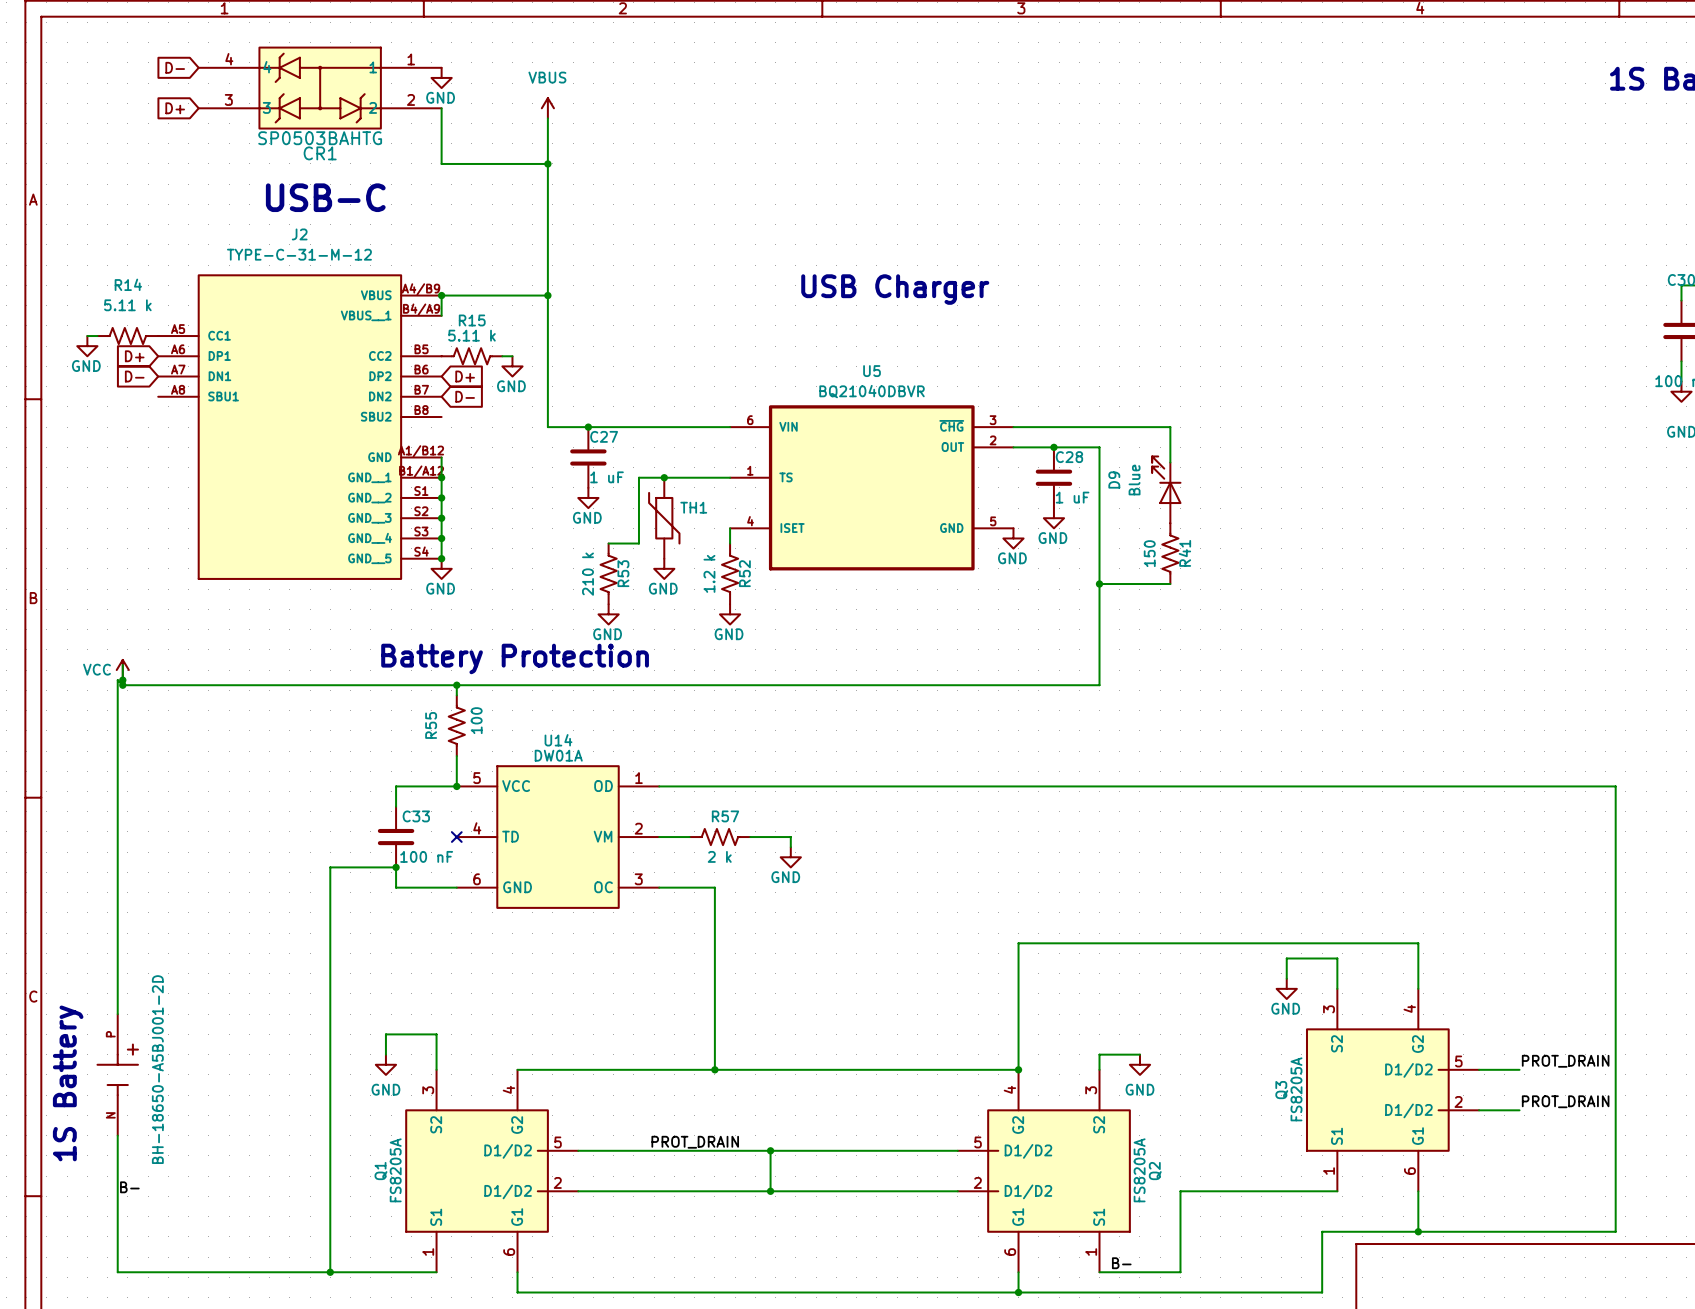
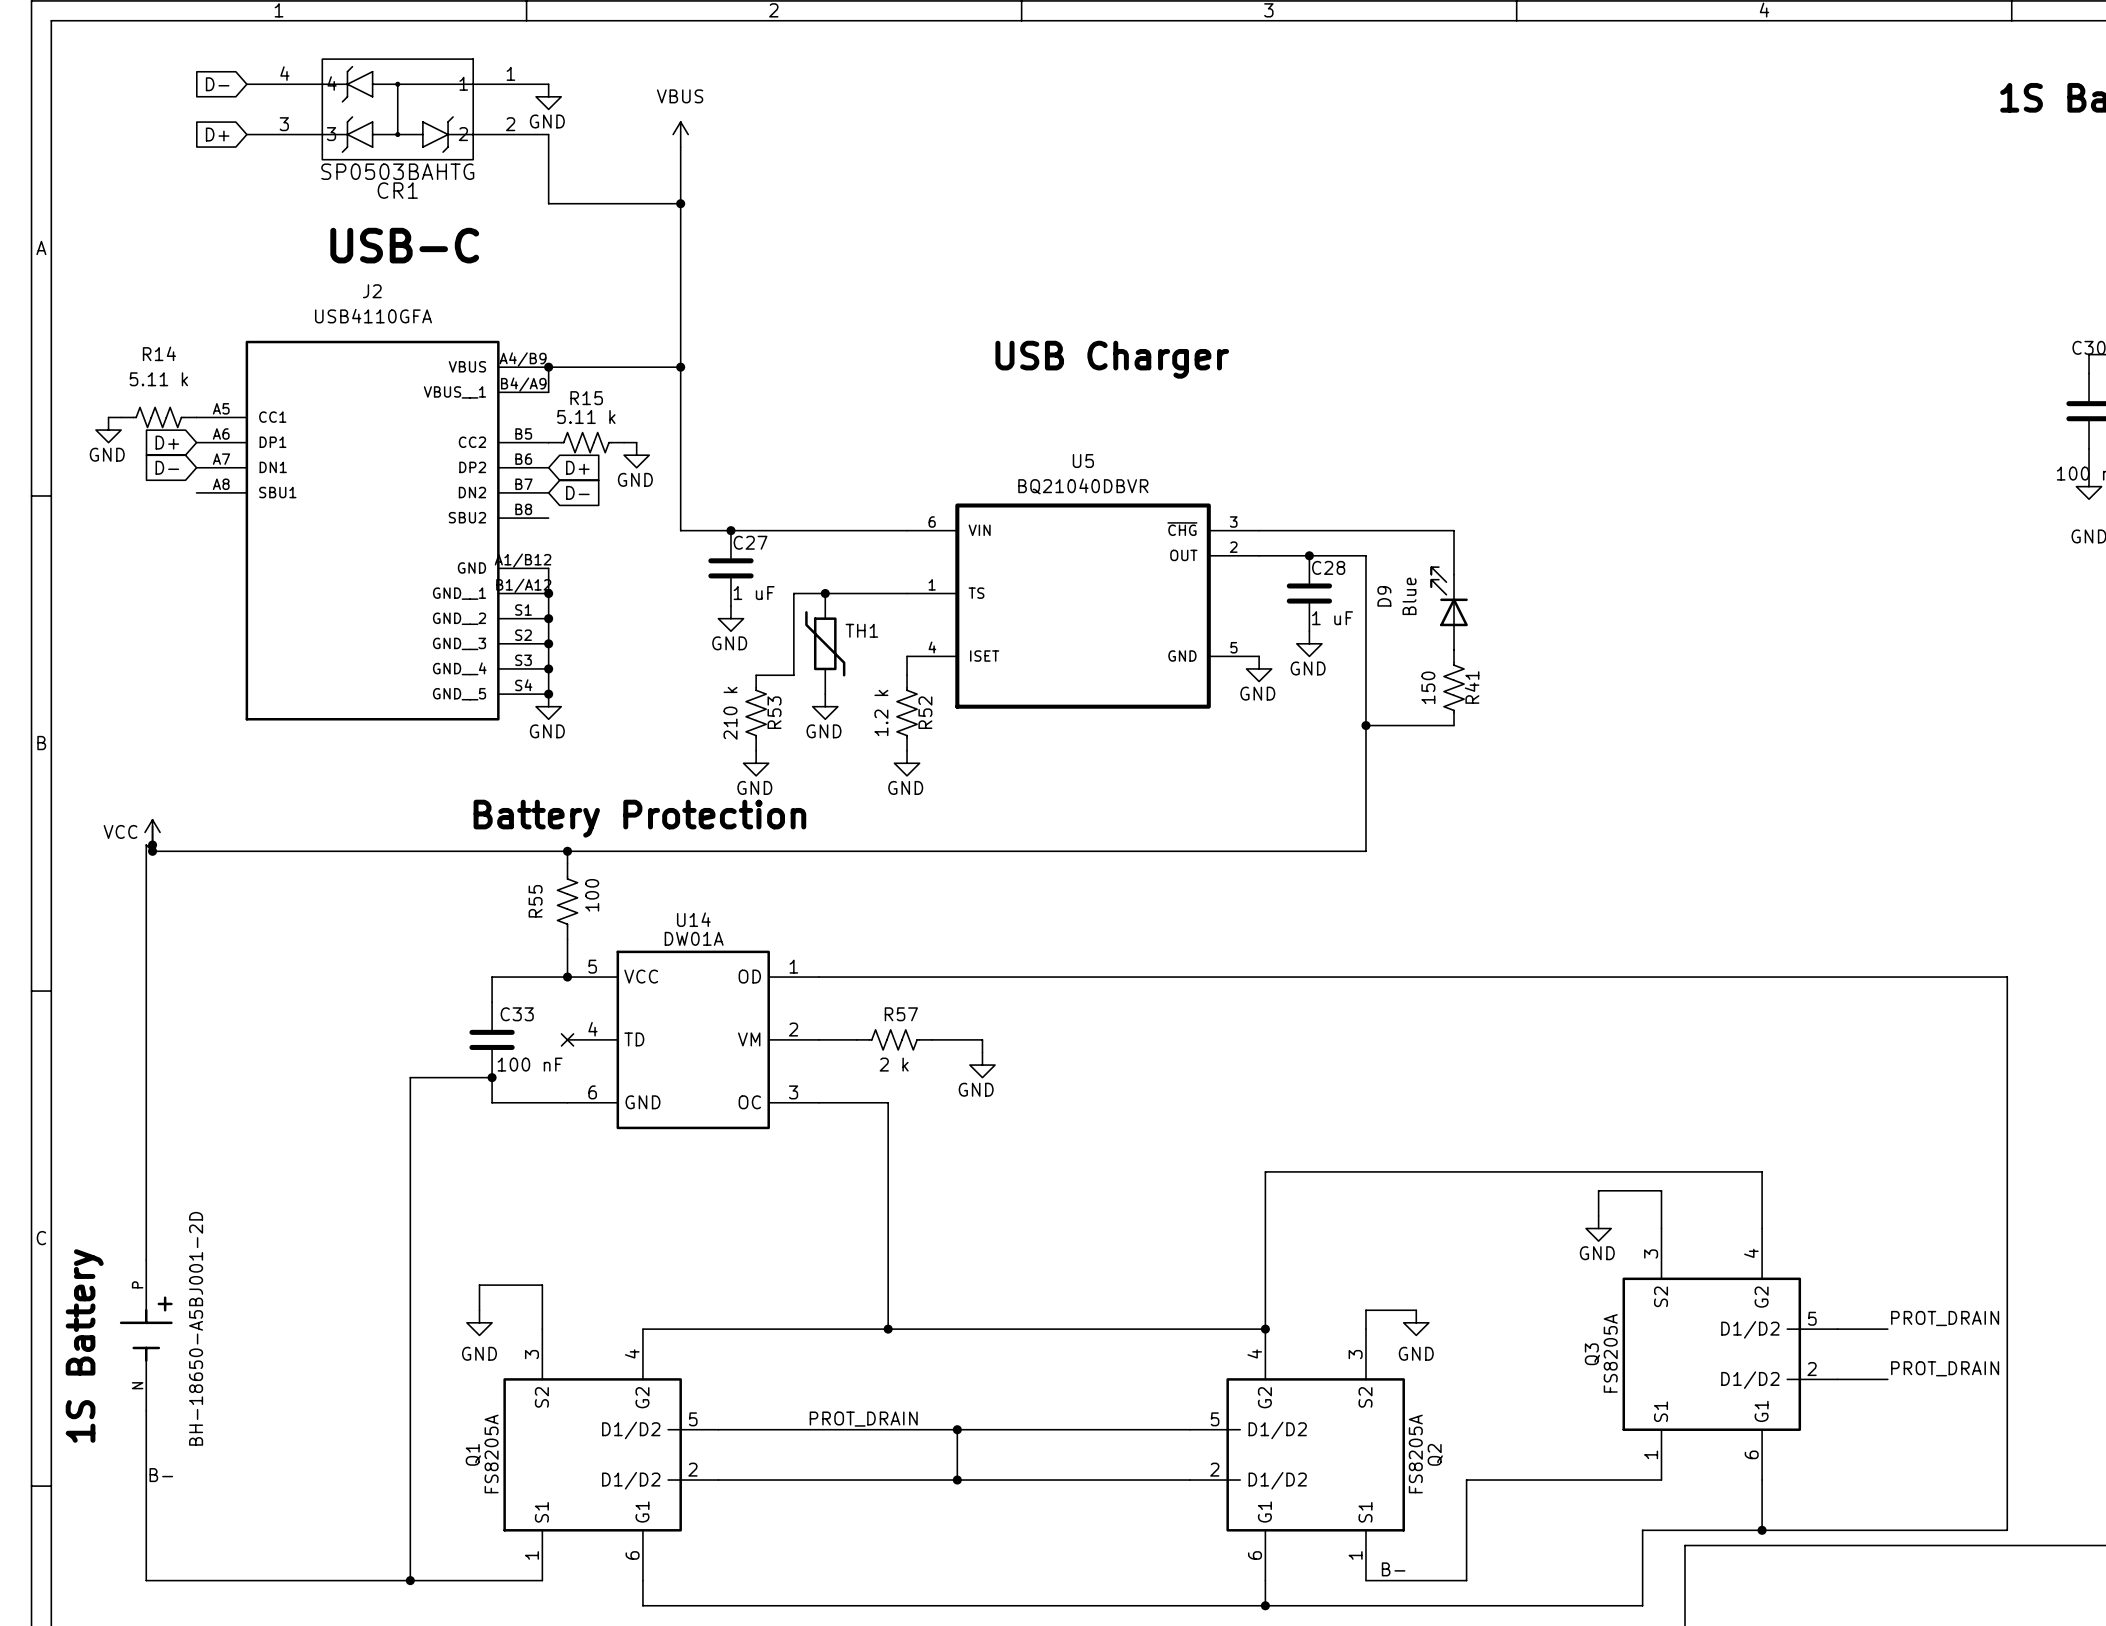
J2 value: TYPE-C-31-M-12 (299, 254) -> USB4110GFA (373, 316)

